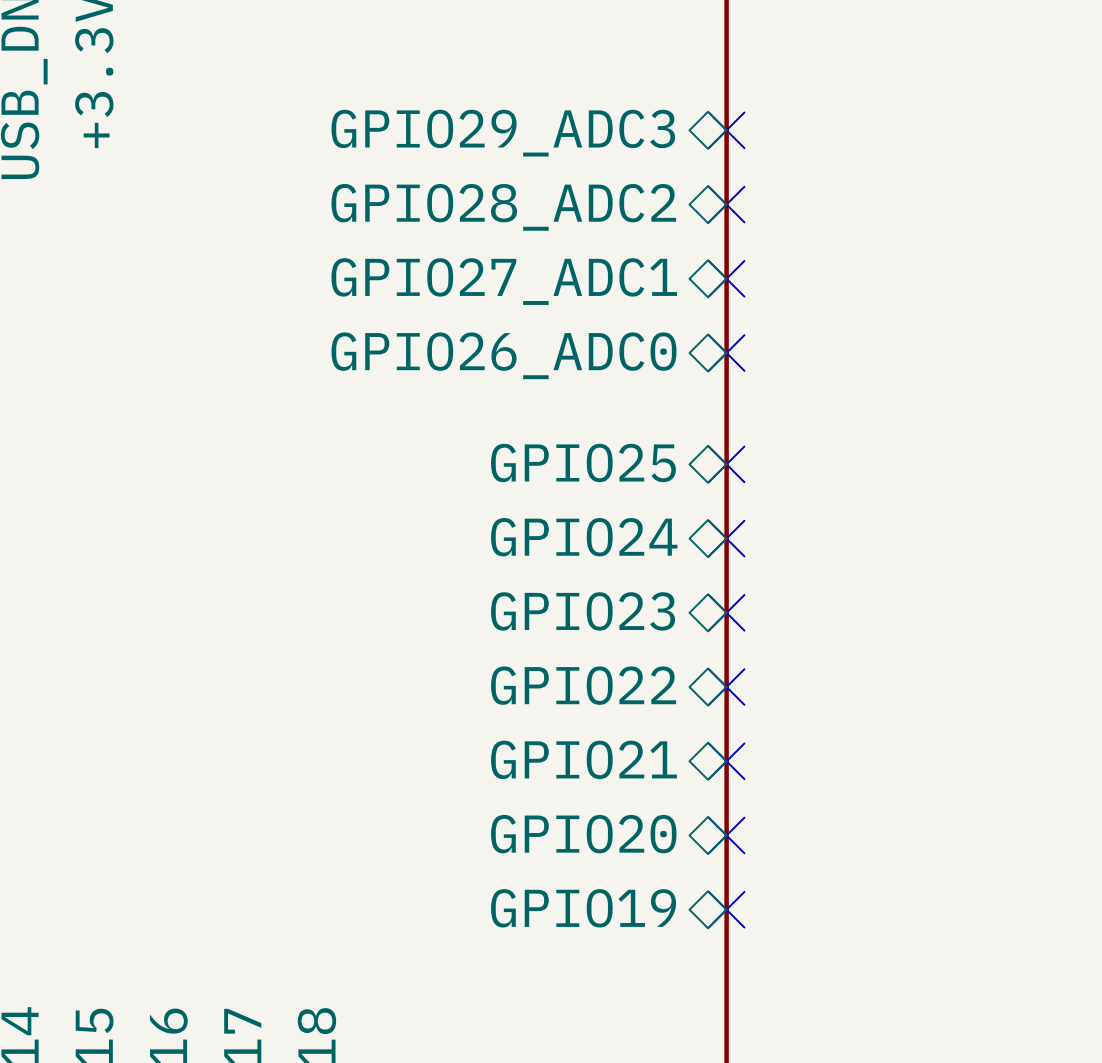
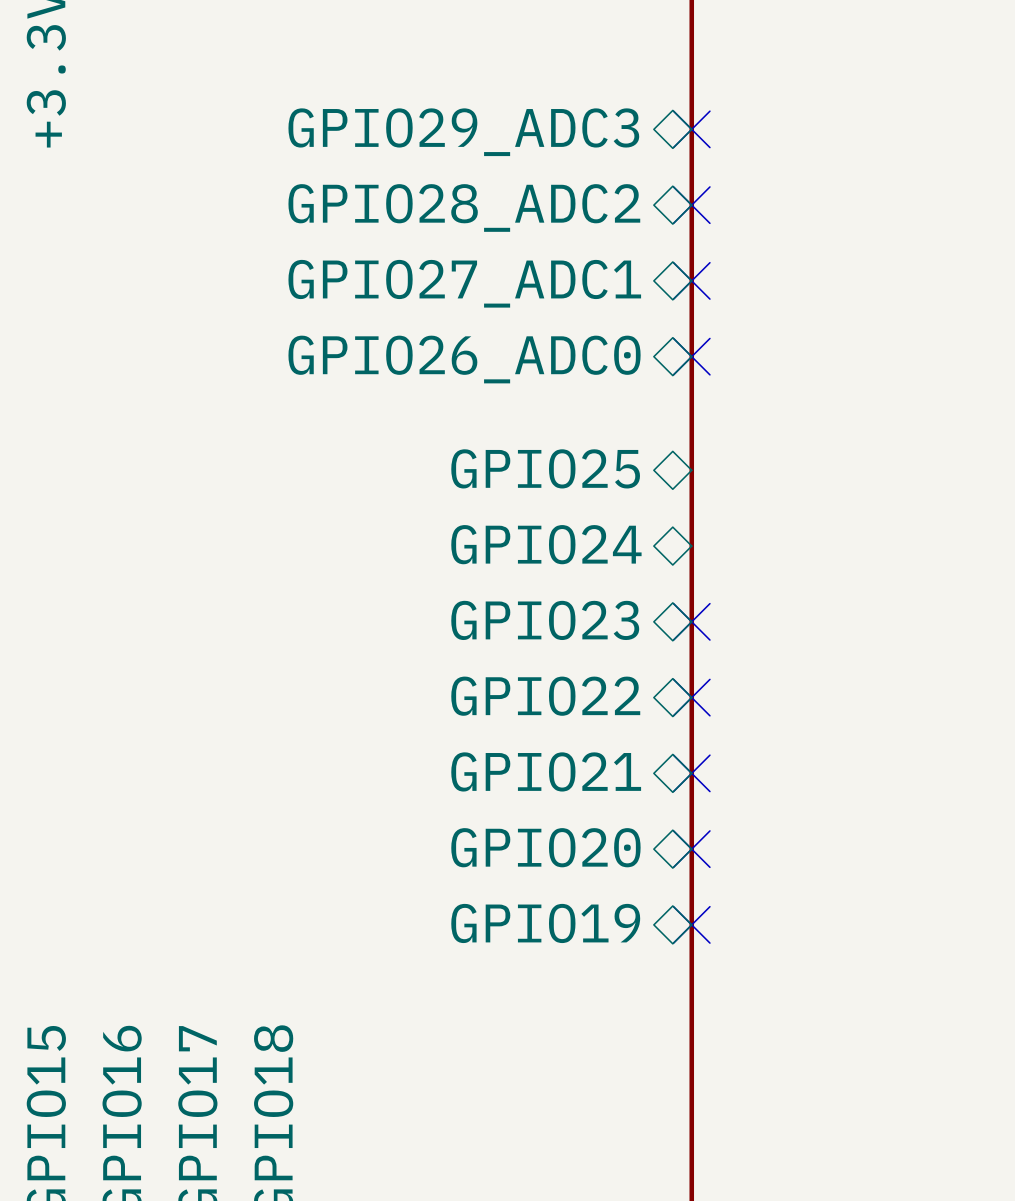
no-connect mark: (726, 464) -> none
no-connect mark: (726, 538) -> none

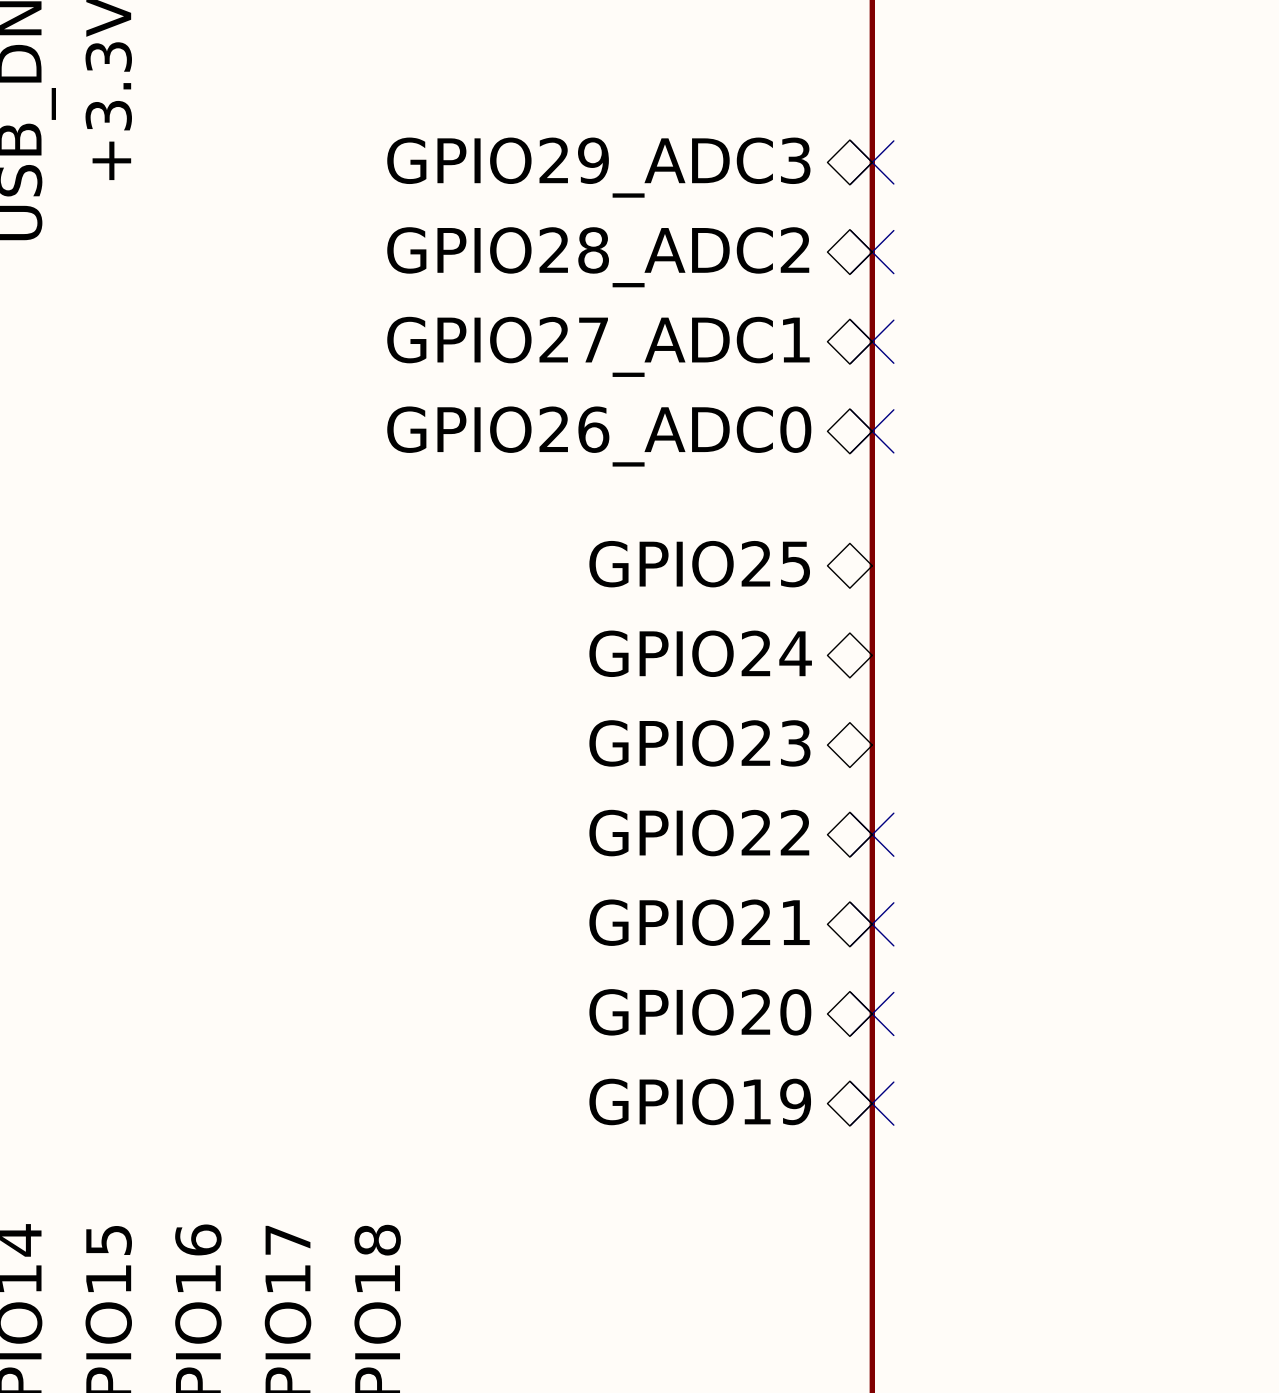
no-connect mark: (691, 621) -> none

